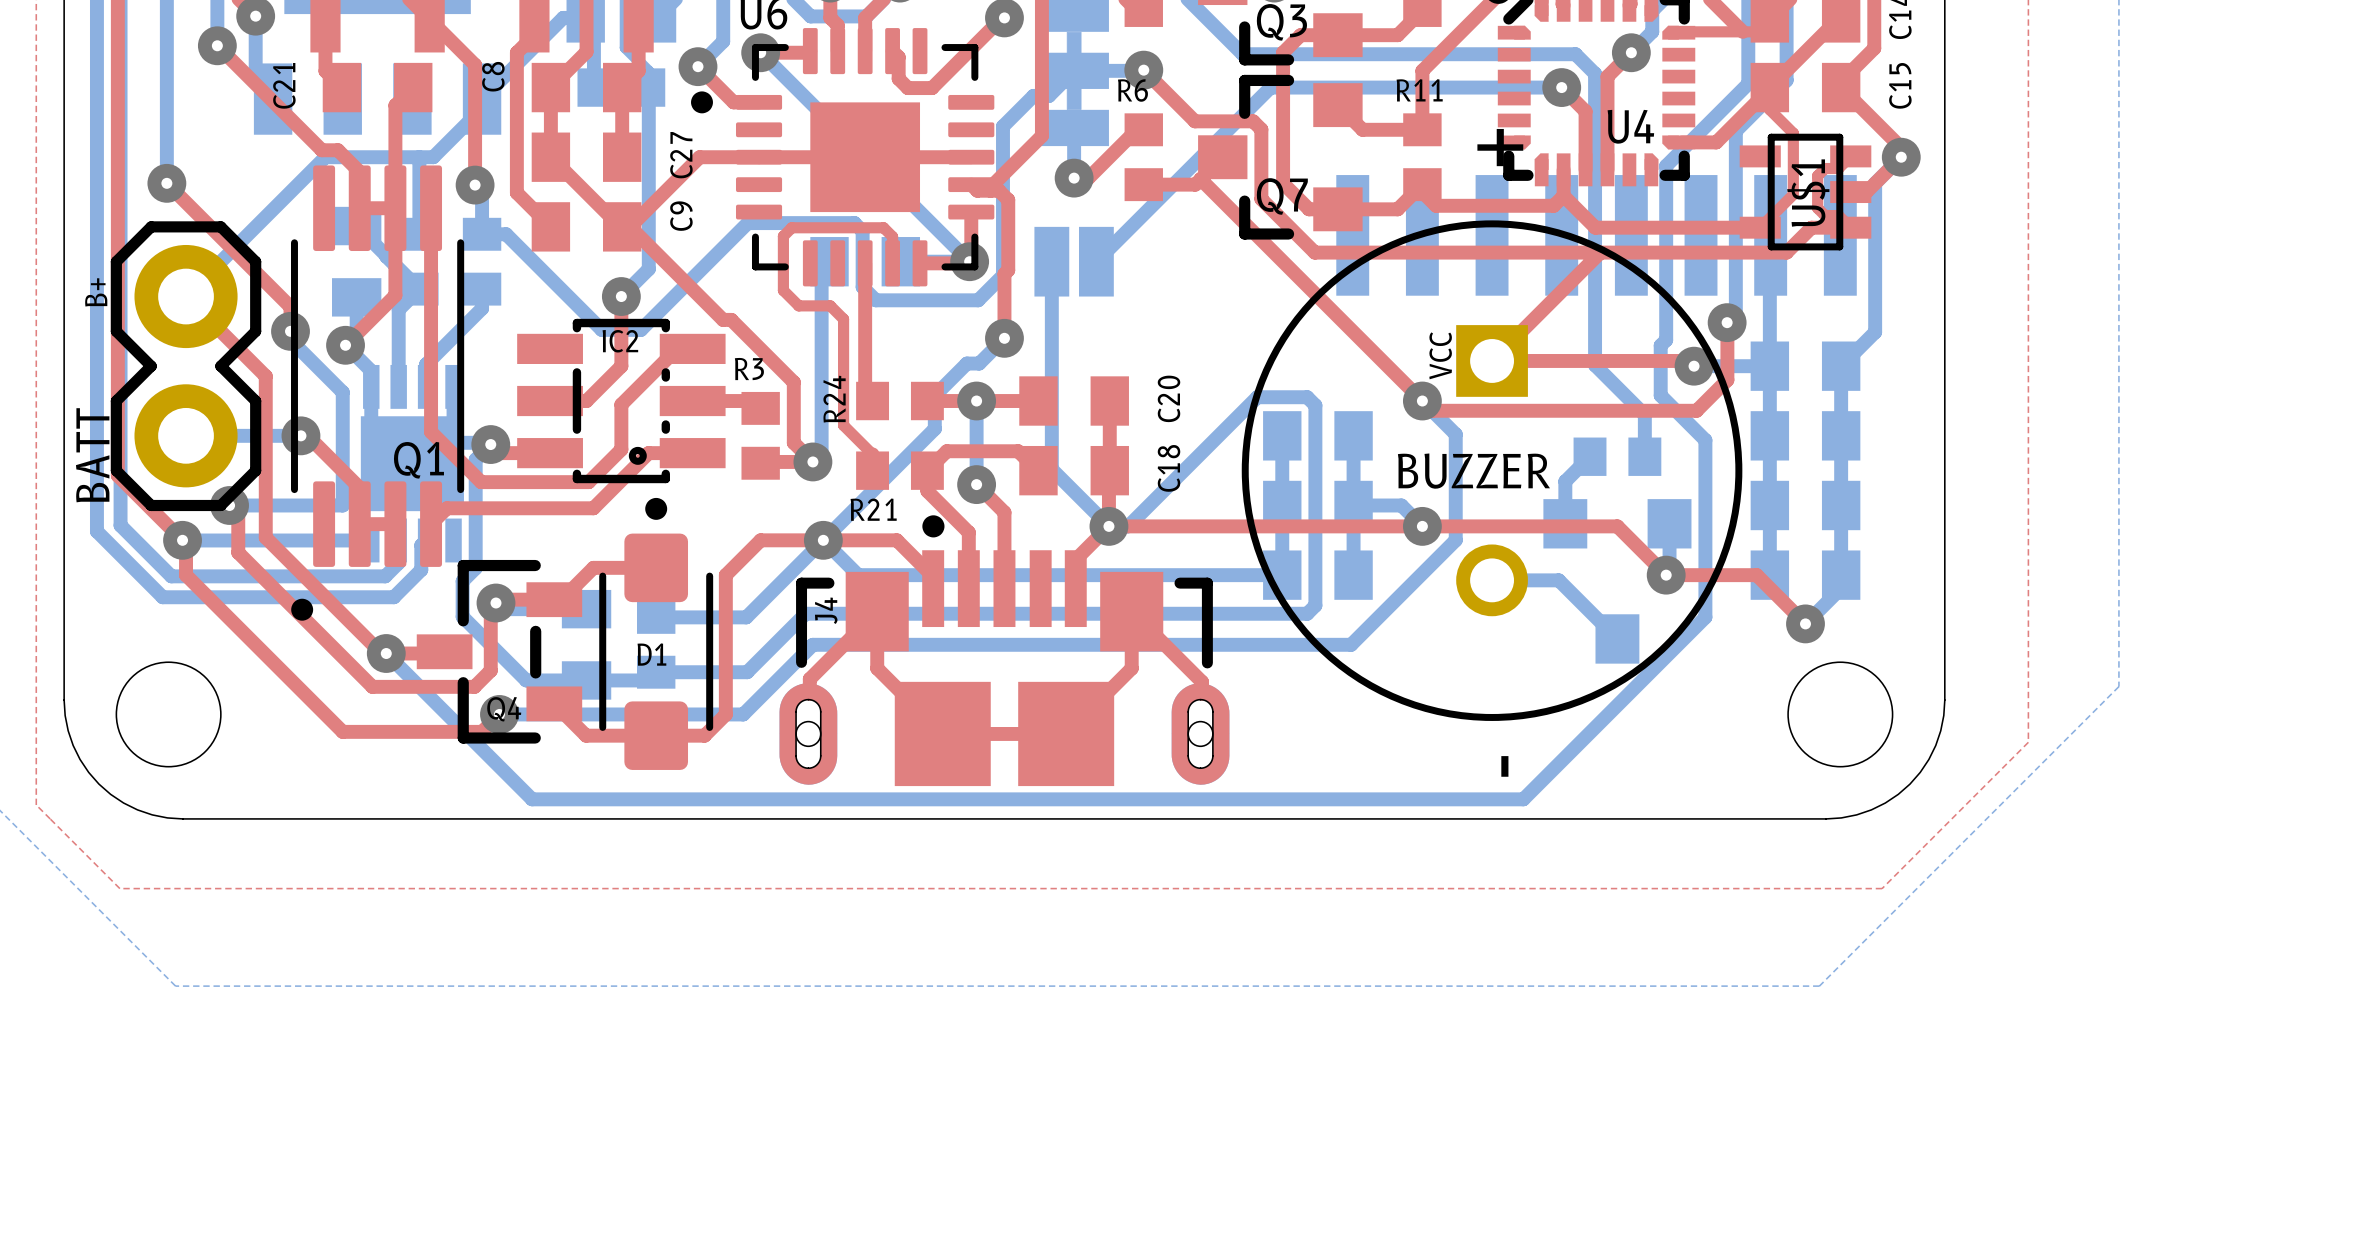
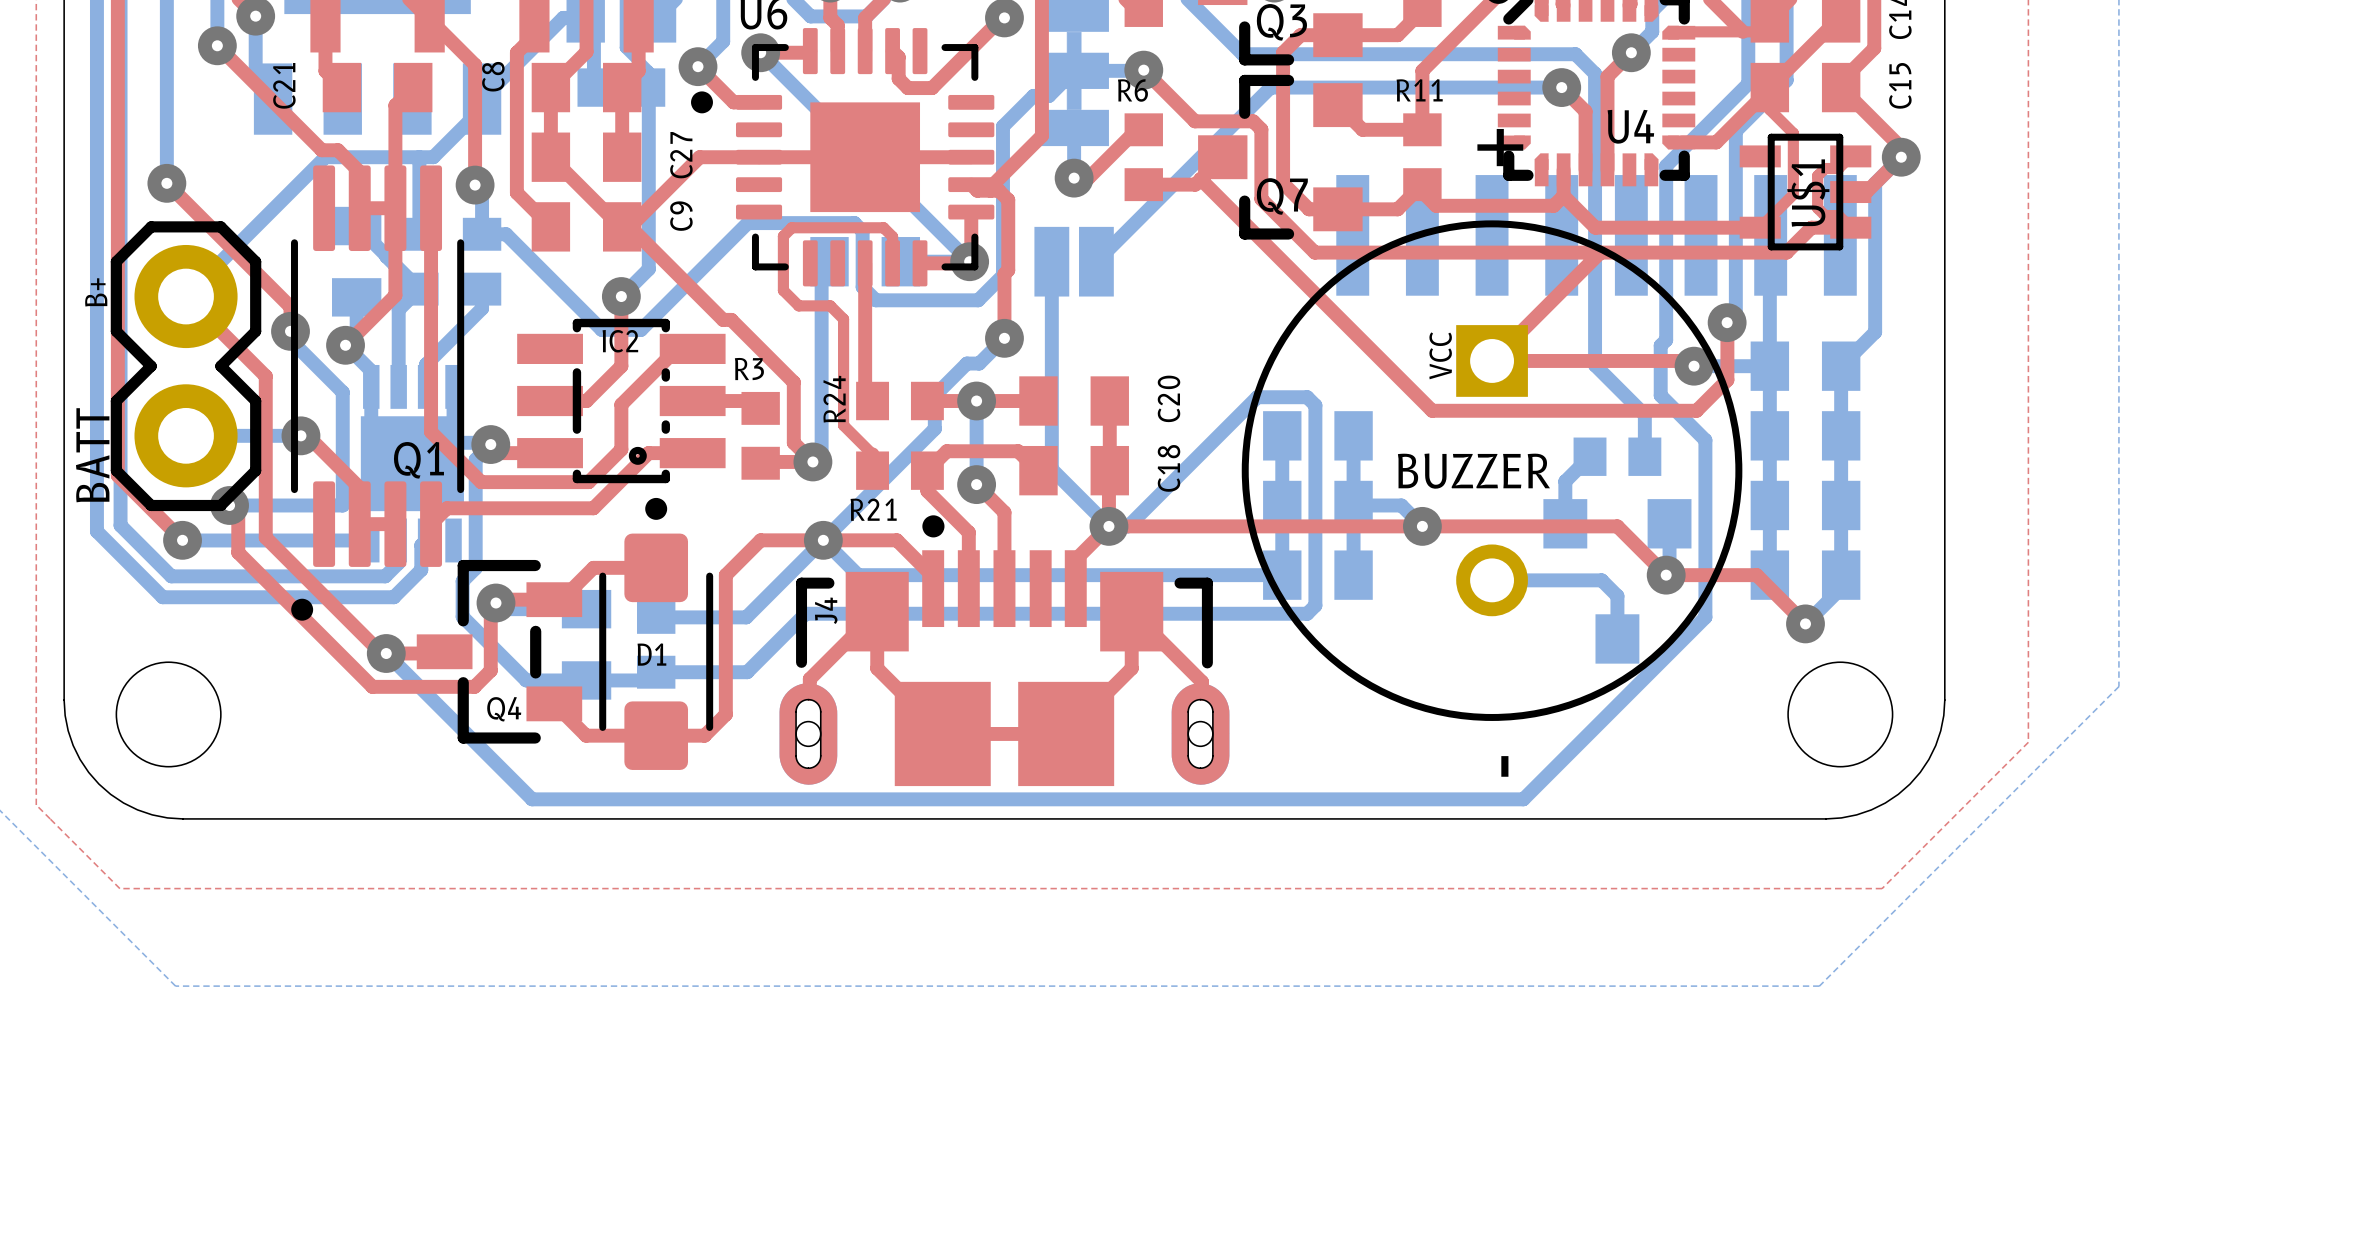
bottom track: (1422, 401) (1455, 434) (1455, 540) (1351, 644) (812, 644) (743, 714) (499, 714) -> none
via: (1422, 401) -> none
top track: (182, 540) (186, 540) (186, 575) (342, 731) (482, 731) (499, 714) -> none
bottom track: (1558, 580) (1617, 638) -> (1558, 580) (1601, 580) (1617, 596) (1617, 638)
via: (499, 714) -> none

